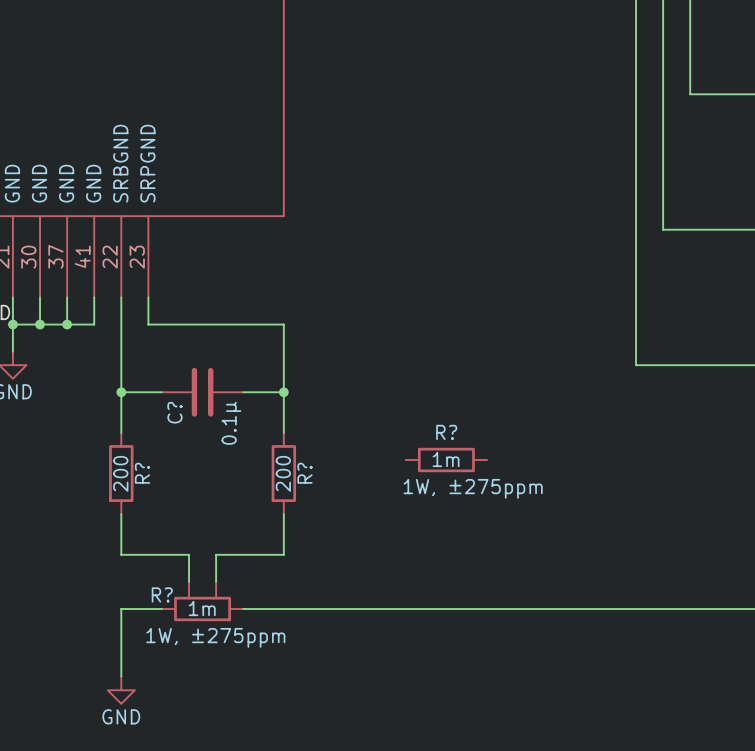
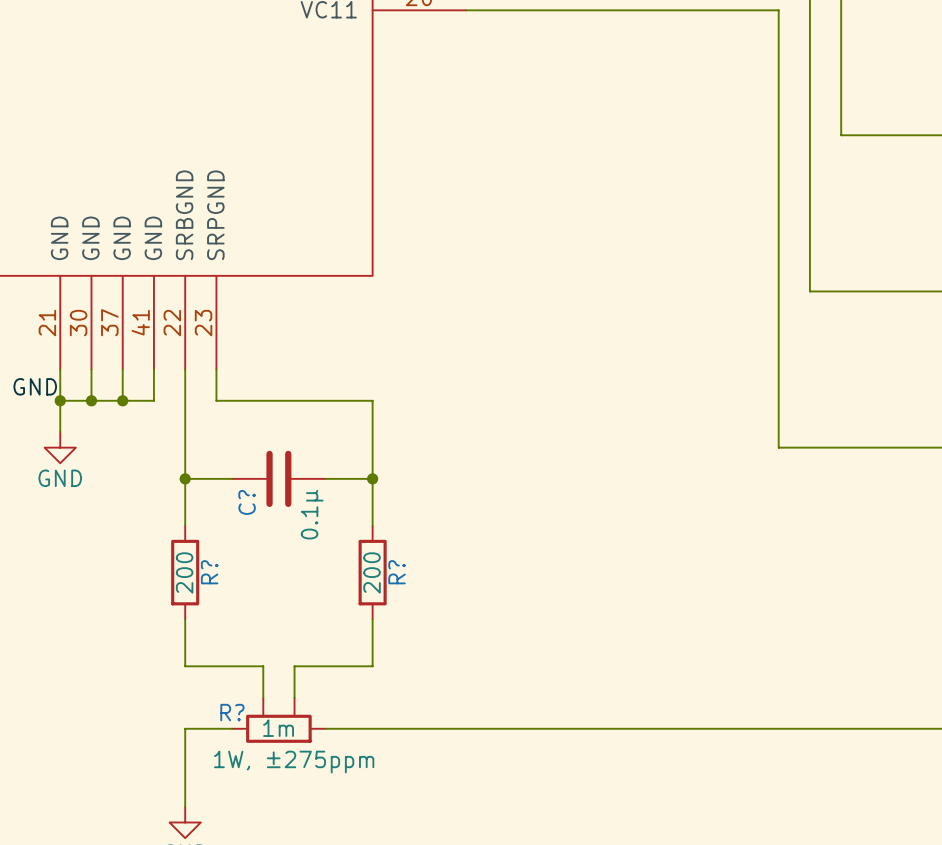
R?: 1m (446, 460) -> none

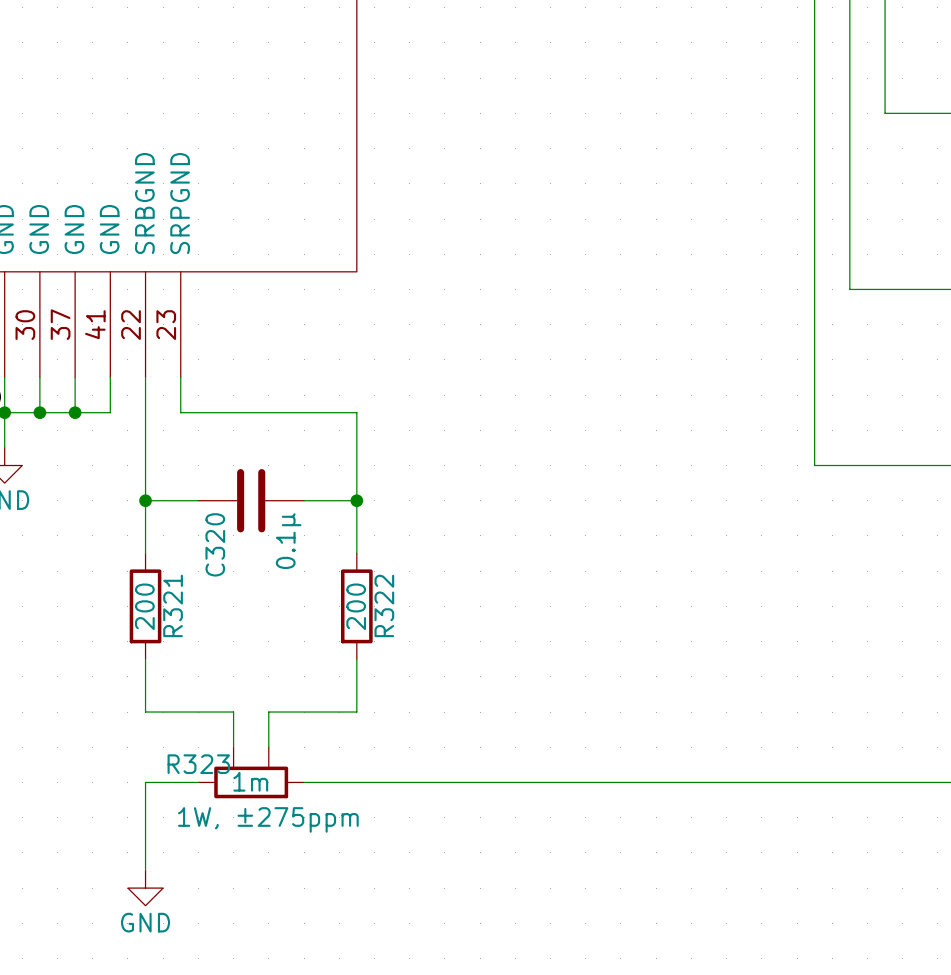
C? name: C? (247, 502) -> C320 (215, 544)
R? name: R? (209, 572) -> R321 (173, 605)
R? name: R? (397, 572) -> R322 (384, 605)
R? name: R? (232, 712) -> R323 (198, 764)

